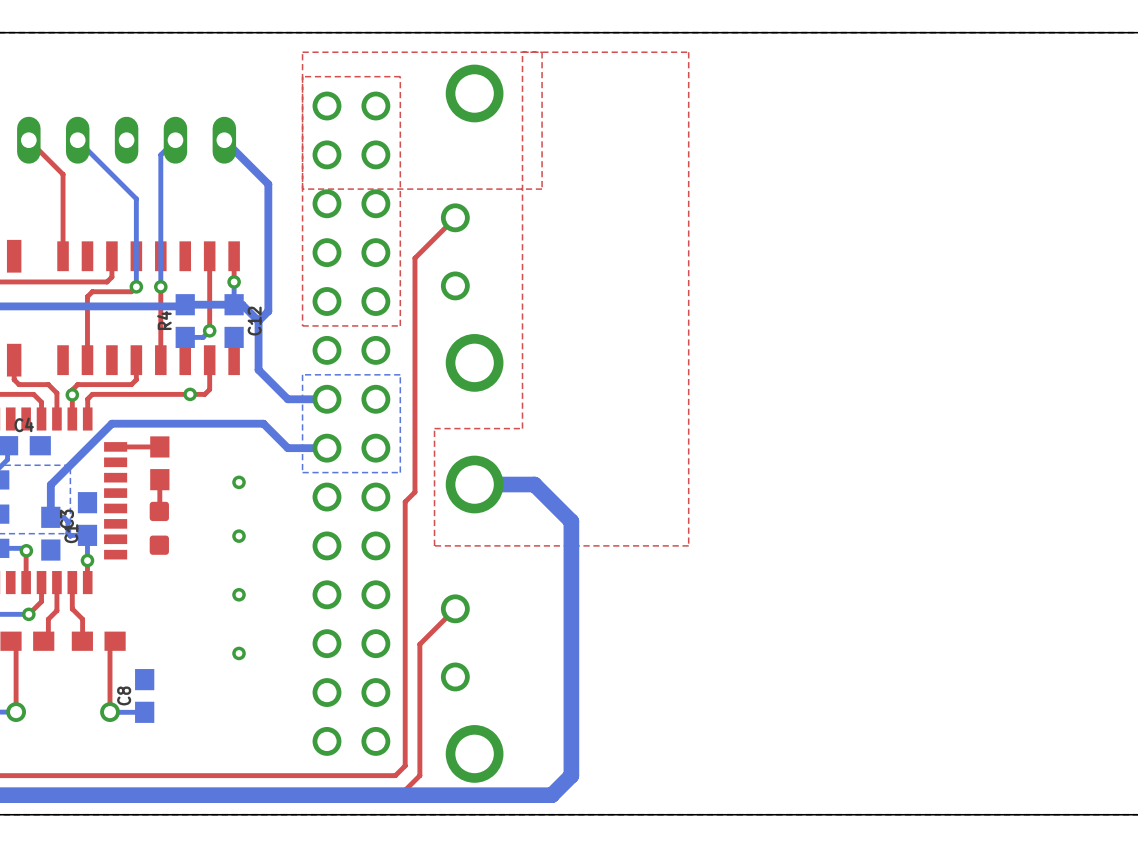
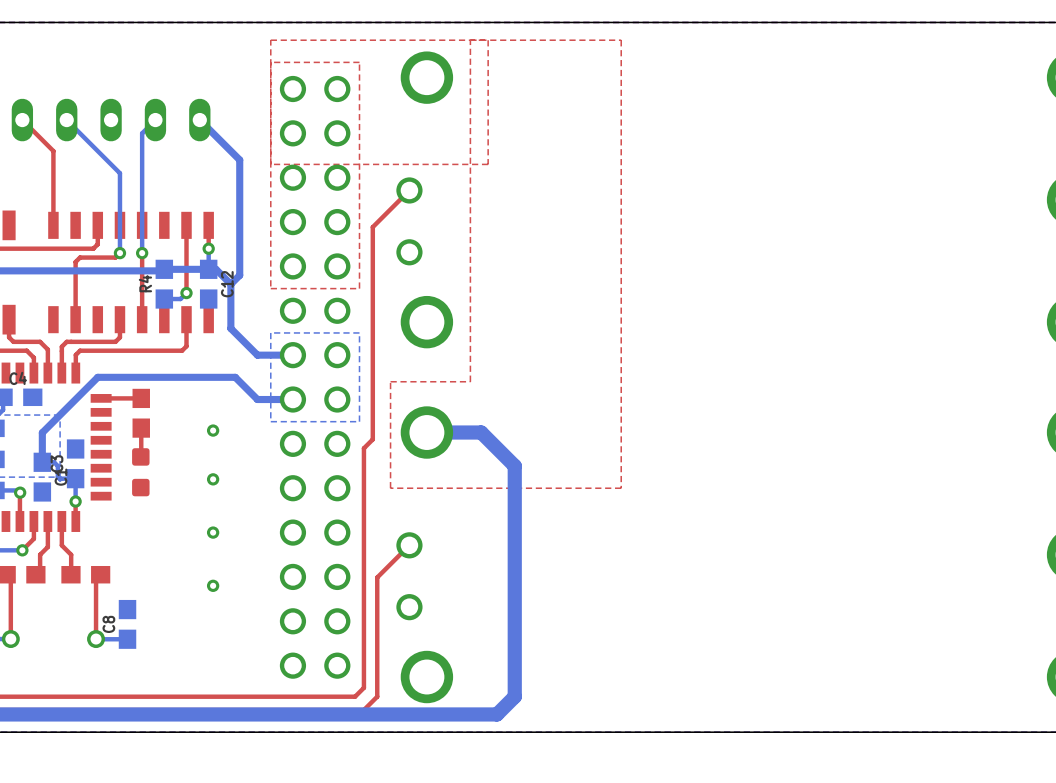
via: (72, 394) -> none
via: (190, 394) -> none

